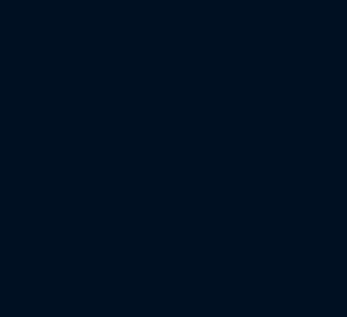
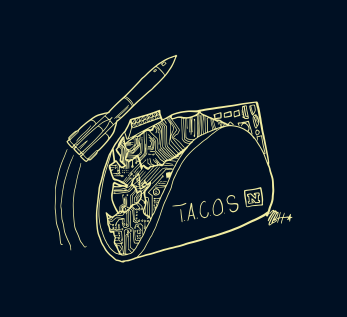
drawing: none -> [54, 54, 293, 263]

